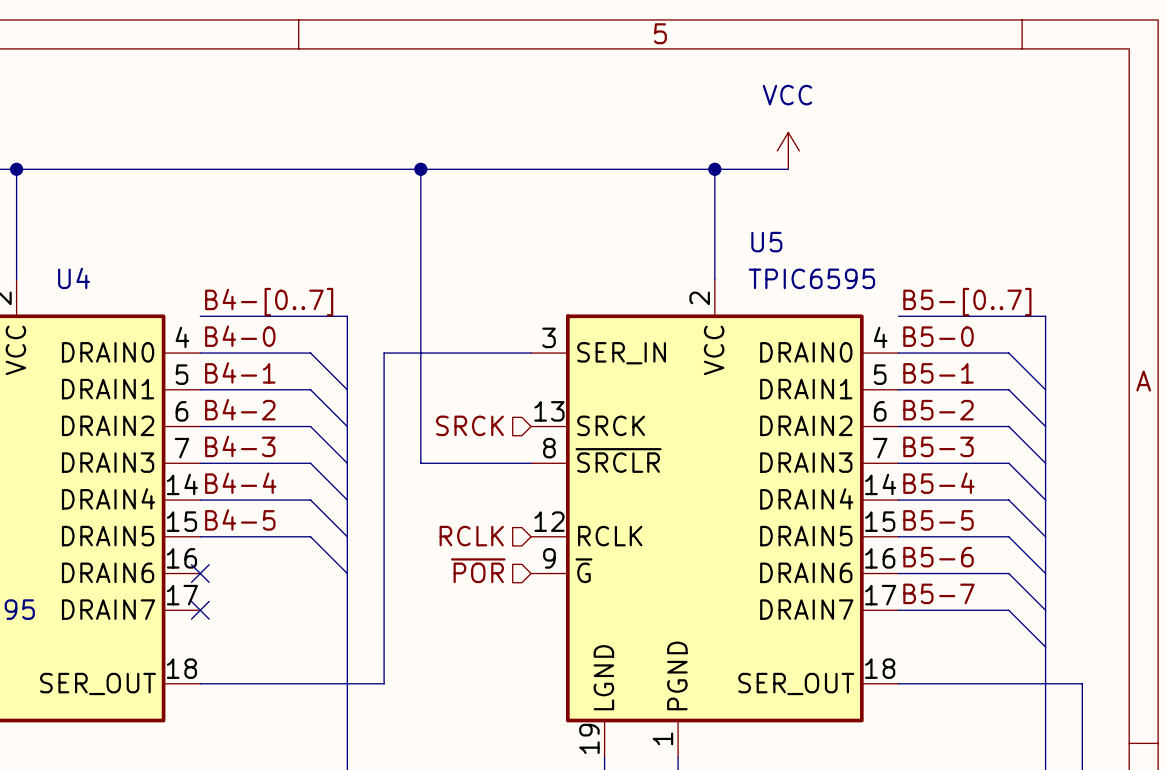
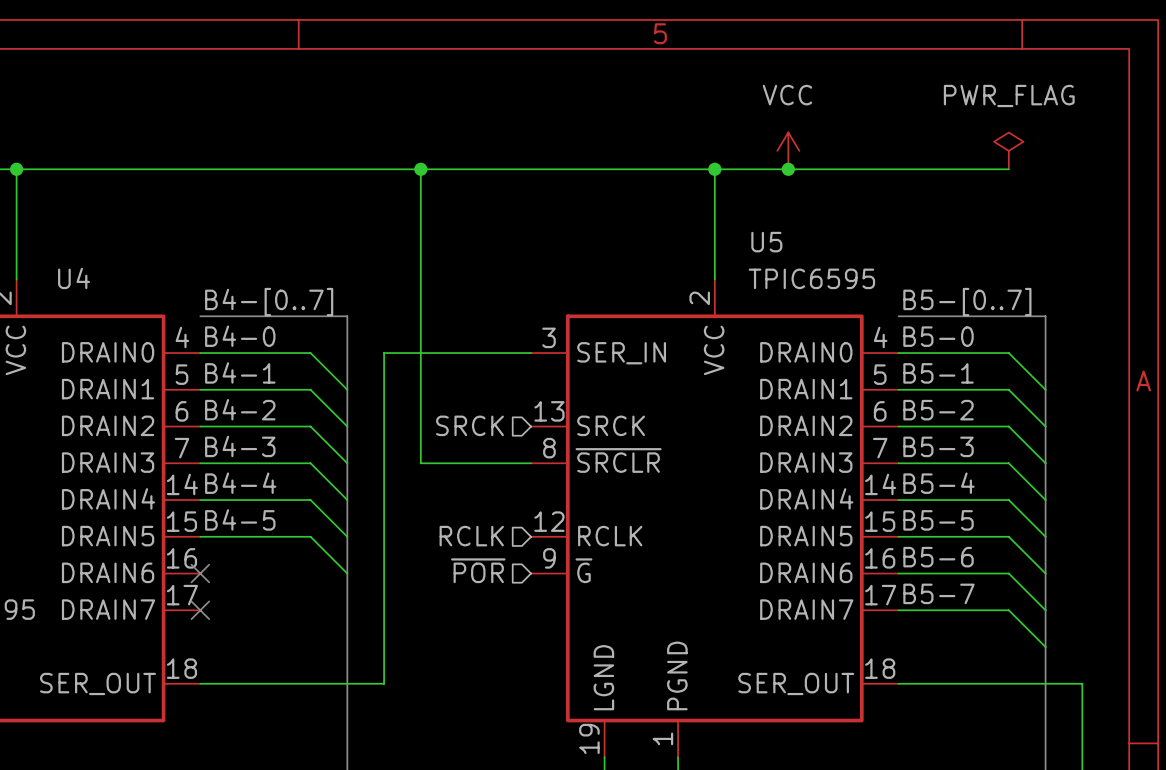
power symbol: none -> PWR_FLAG (1008, 150)
wire: none -> (788, 169) (1008, 169)
junction: none -> (788, 169)

